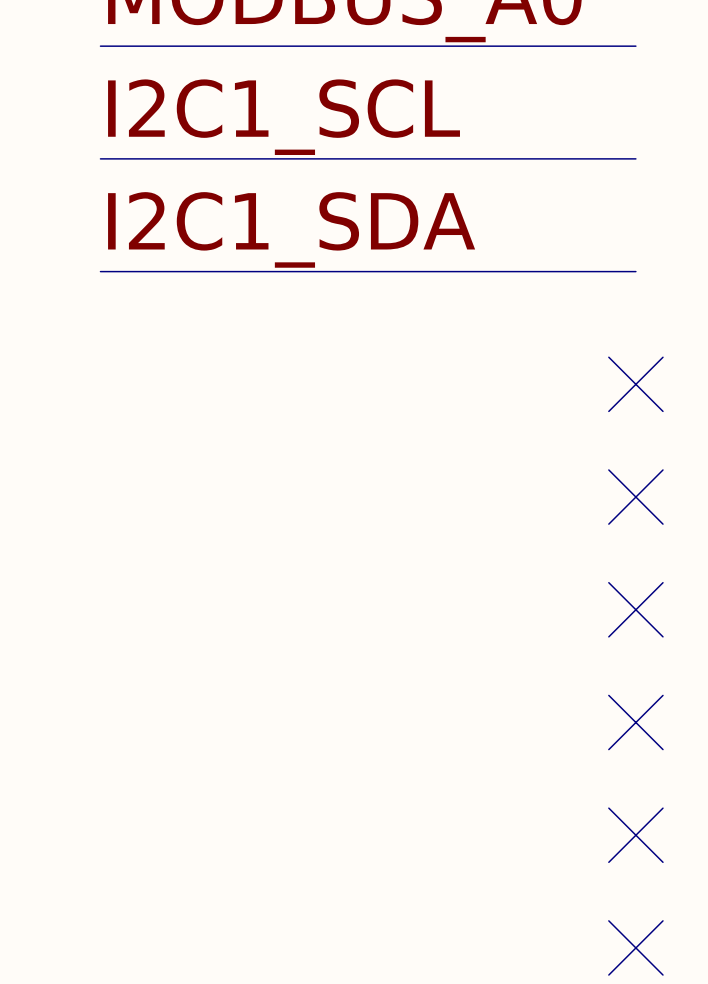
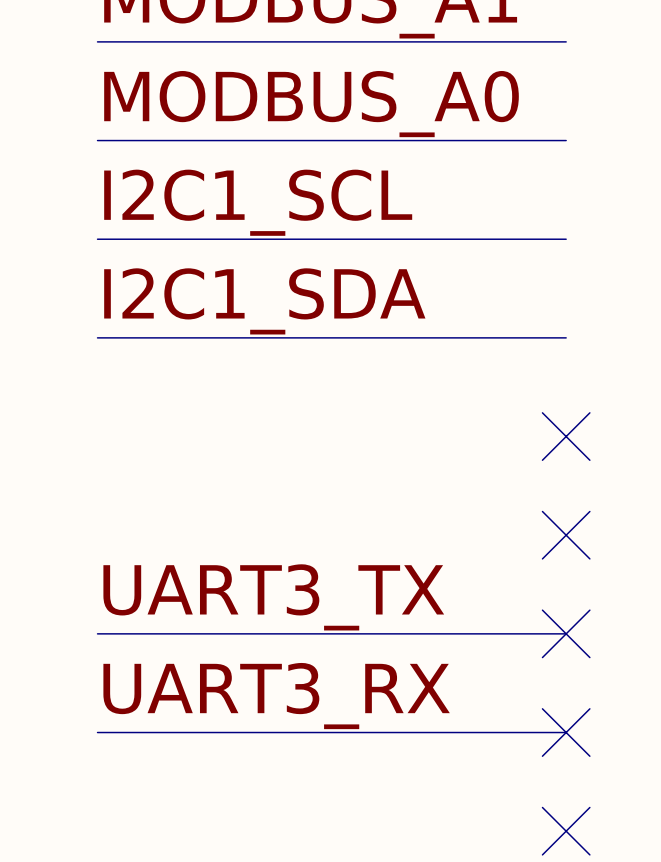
label: none -> UART3_TX (273, 597)
wire: none -> (97, 633) (566, 633)
label: none -> UART3_RX (276, 696)
wire: none -> (97, 732) (566, 732)

